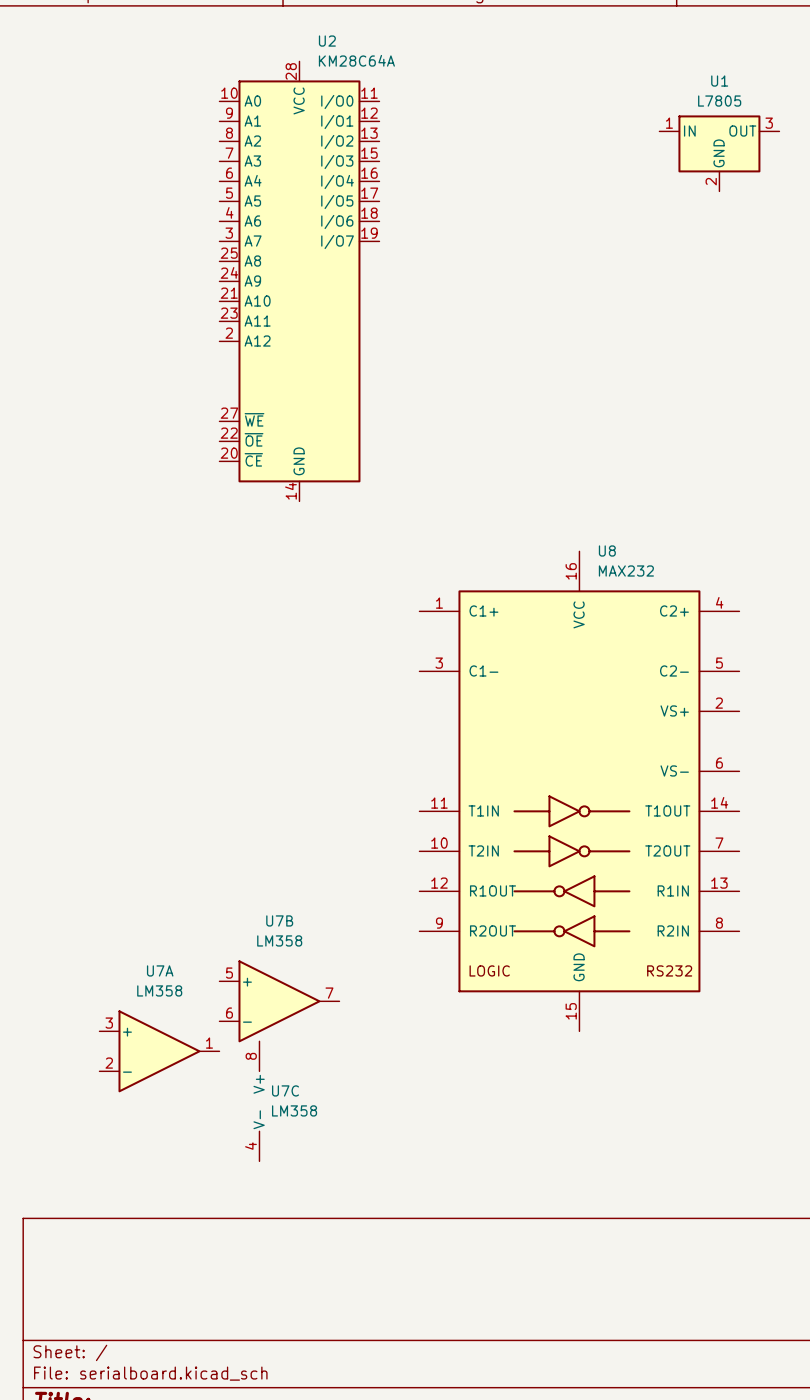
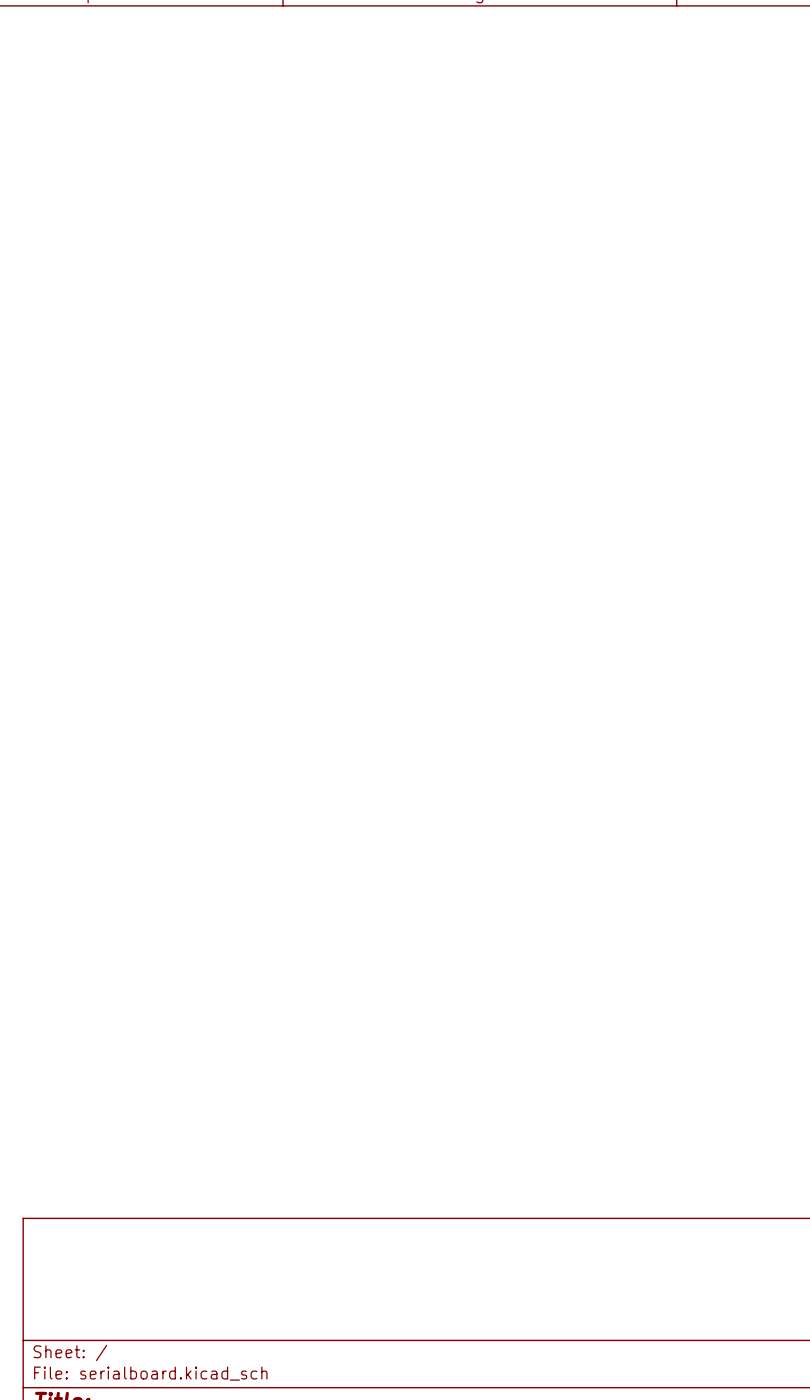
U1: L7805 (719, 153) -> none
U2: KM28C64A (299, 281) -> none
U8: MAX232 (579, 791) -> none
U7B: LM358 (279, 1001) -> none
U7A: LM358 (159, 1051) -> none
U7C: LM358 (259, 1101) -> none

